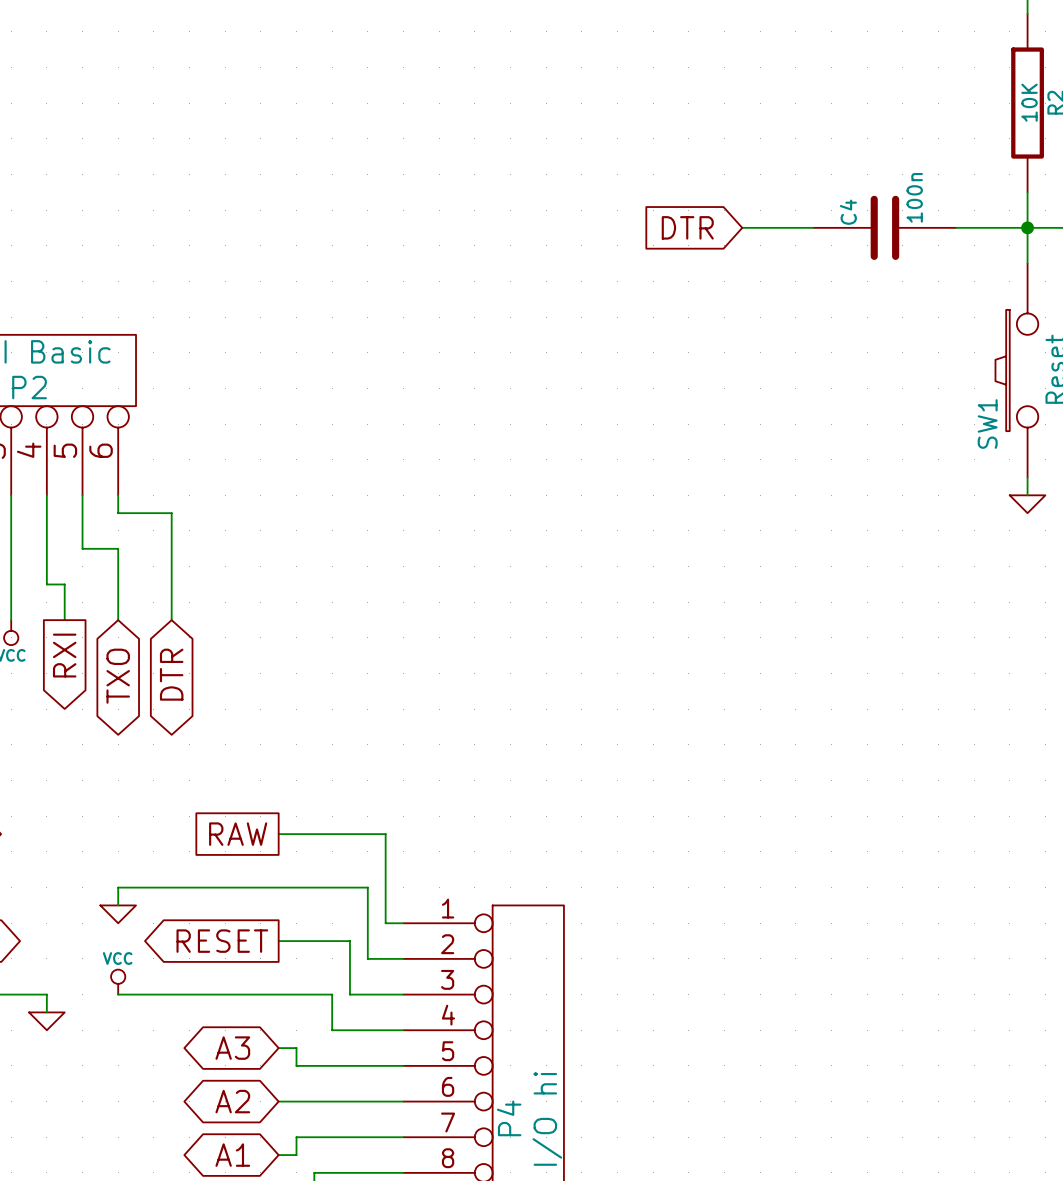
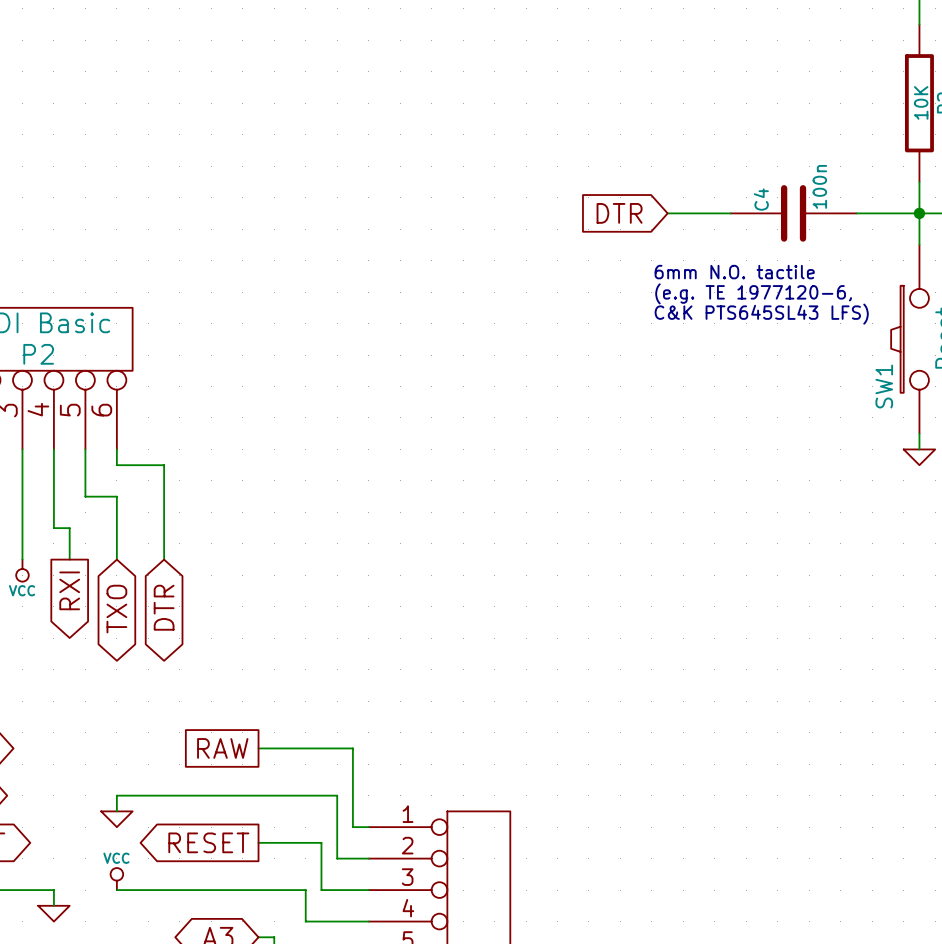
text: none -> 6mm N.O. tactile (734, 272)
text: none -> (e.g. TE 1977120-6, (753, 293)
text: none -> C&K PTS645SL43 LFS) (761, 314)

